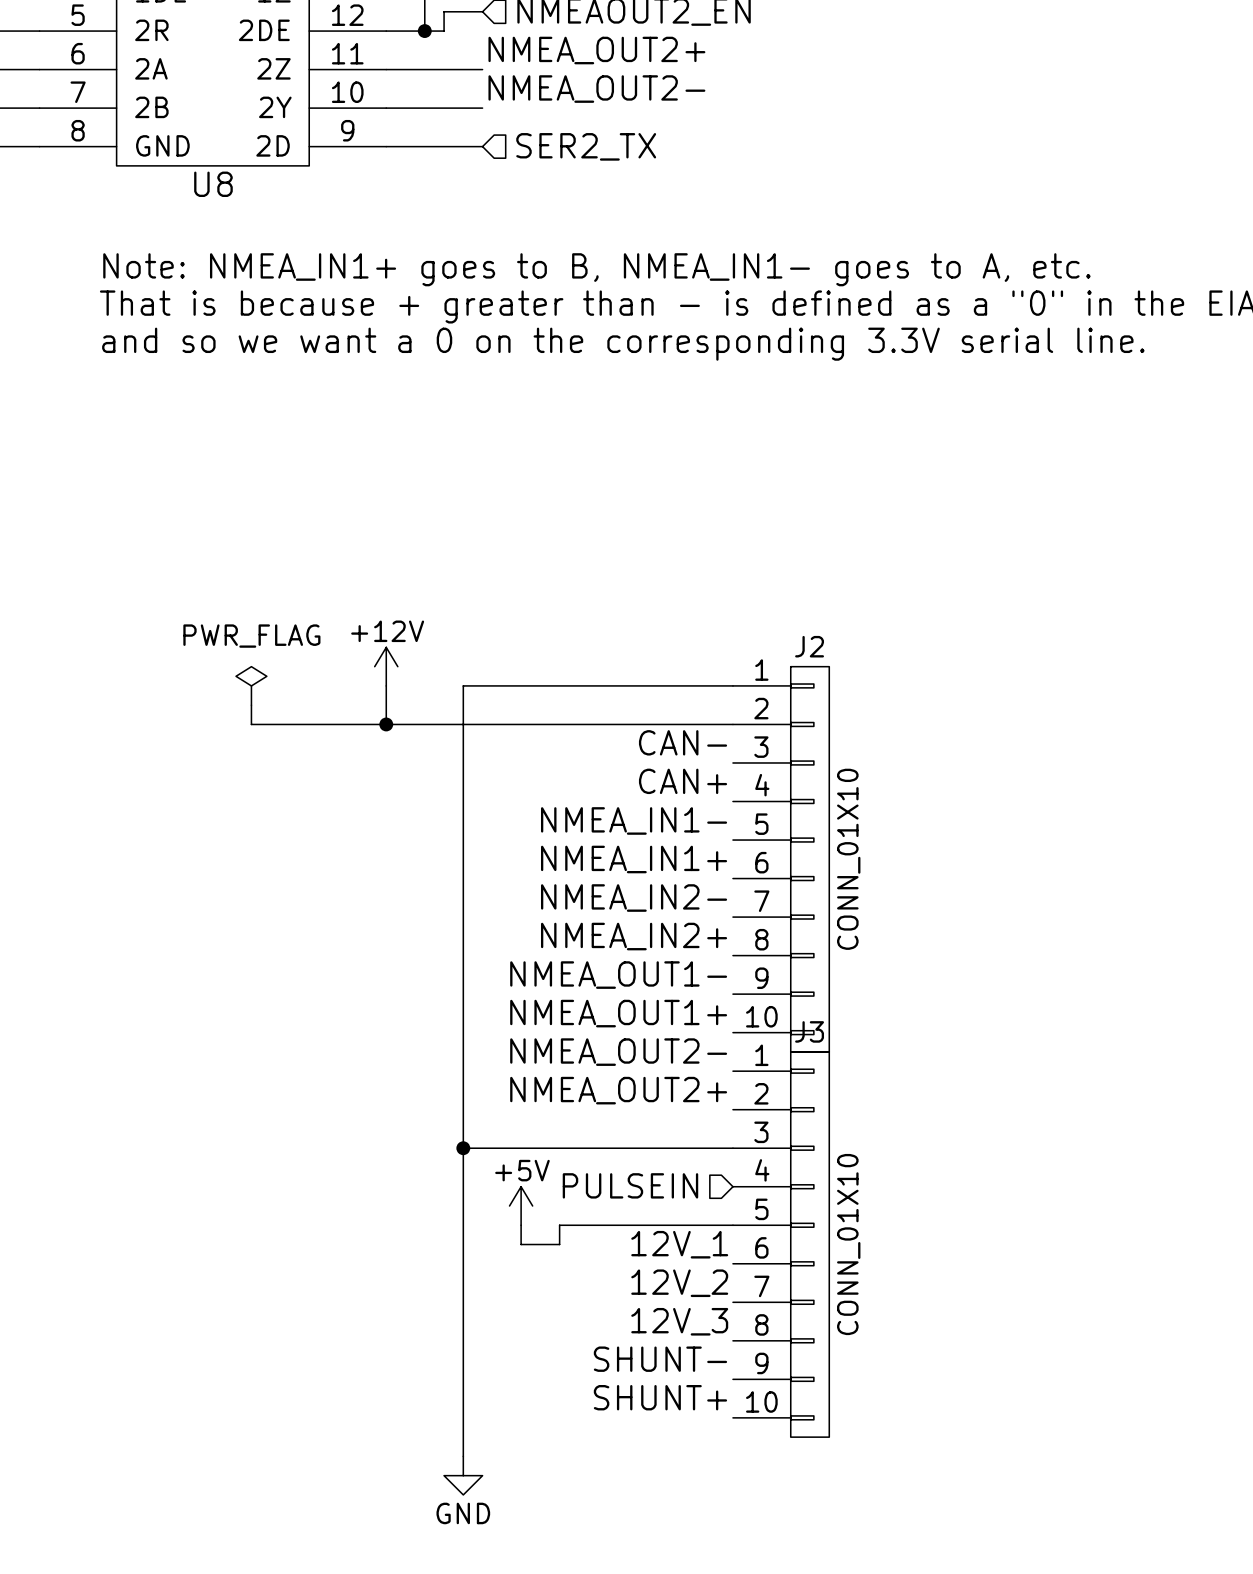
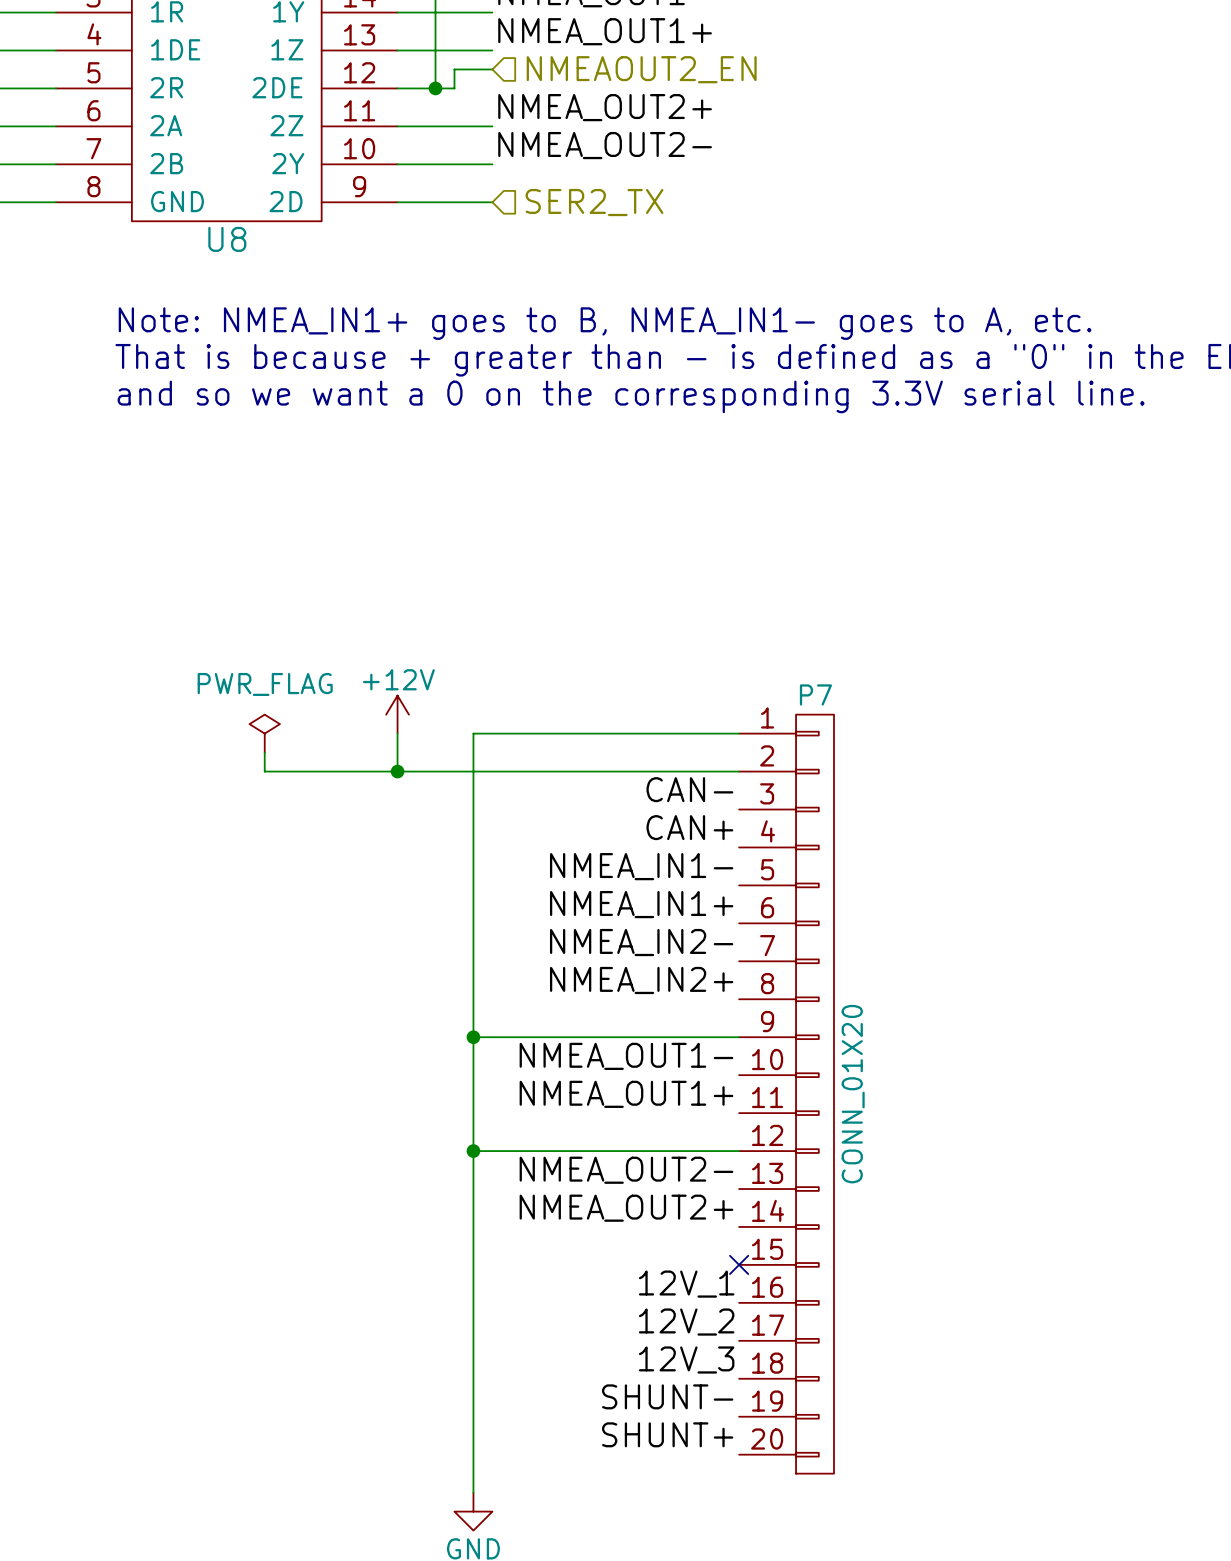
J2: CONN_01X10 (781, 859) -> none
label: NMEA_OUT1- (618, 975) -> none
wire: none -> (473, 1037) (739, 1037)
junction: none -> (473, 1037)
label: NMEA_OUT1+ (618, 1013) -> NMEA_OUT1- (626, 1056)
P7: none -> CONN_01X20 (786, 1094)
label: NMEA_OUT2- (618, 1052) -> NMEA_OUT1+ (626, 1094)
label position: NMEA_OUT2+ (618, 1090) -> NMEA_OUT2+ (626, 1208)
label: none -> NMEA_OUT2- (626, 1170)
wire: (463, 1148) (732, 1148) -> (473, 1151) (739, 1151)
junction position: (463, 1148) -> (473, 1151)
hierarchical label: PULSEIN (630, 1185) -> none
power symbol: +5V (521, 1206) -> none
wire: (521, 1225) (521, 1244) (559, 1244) (559, 1225) (732, 1225) -> none
no-connect mark: none -> (739, 1264)
J3: CONN_01X10 (781, 1244) -> none

